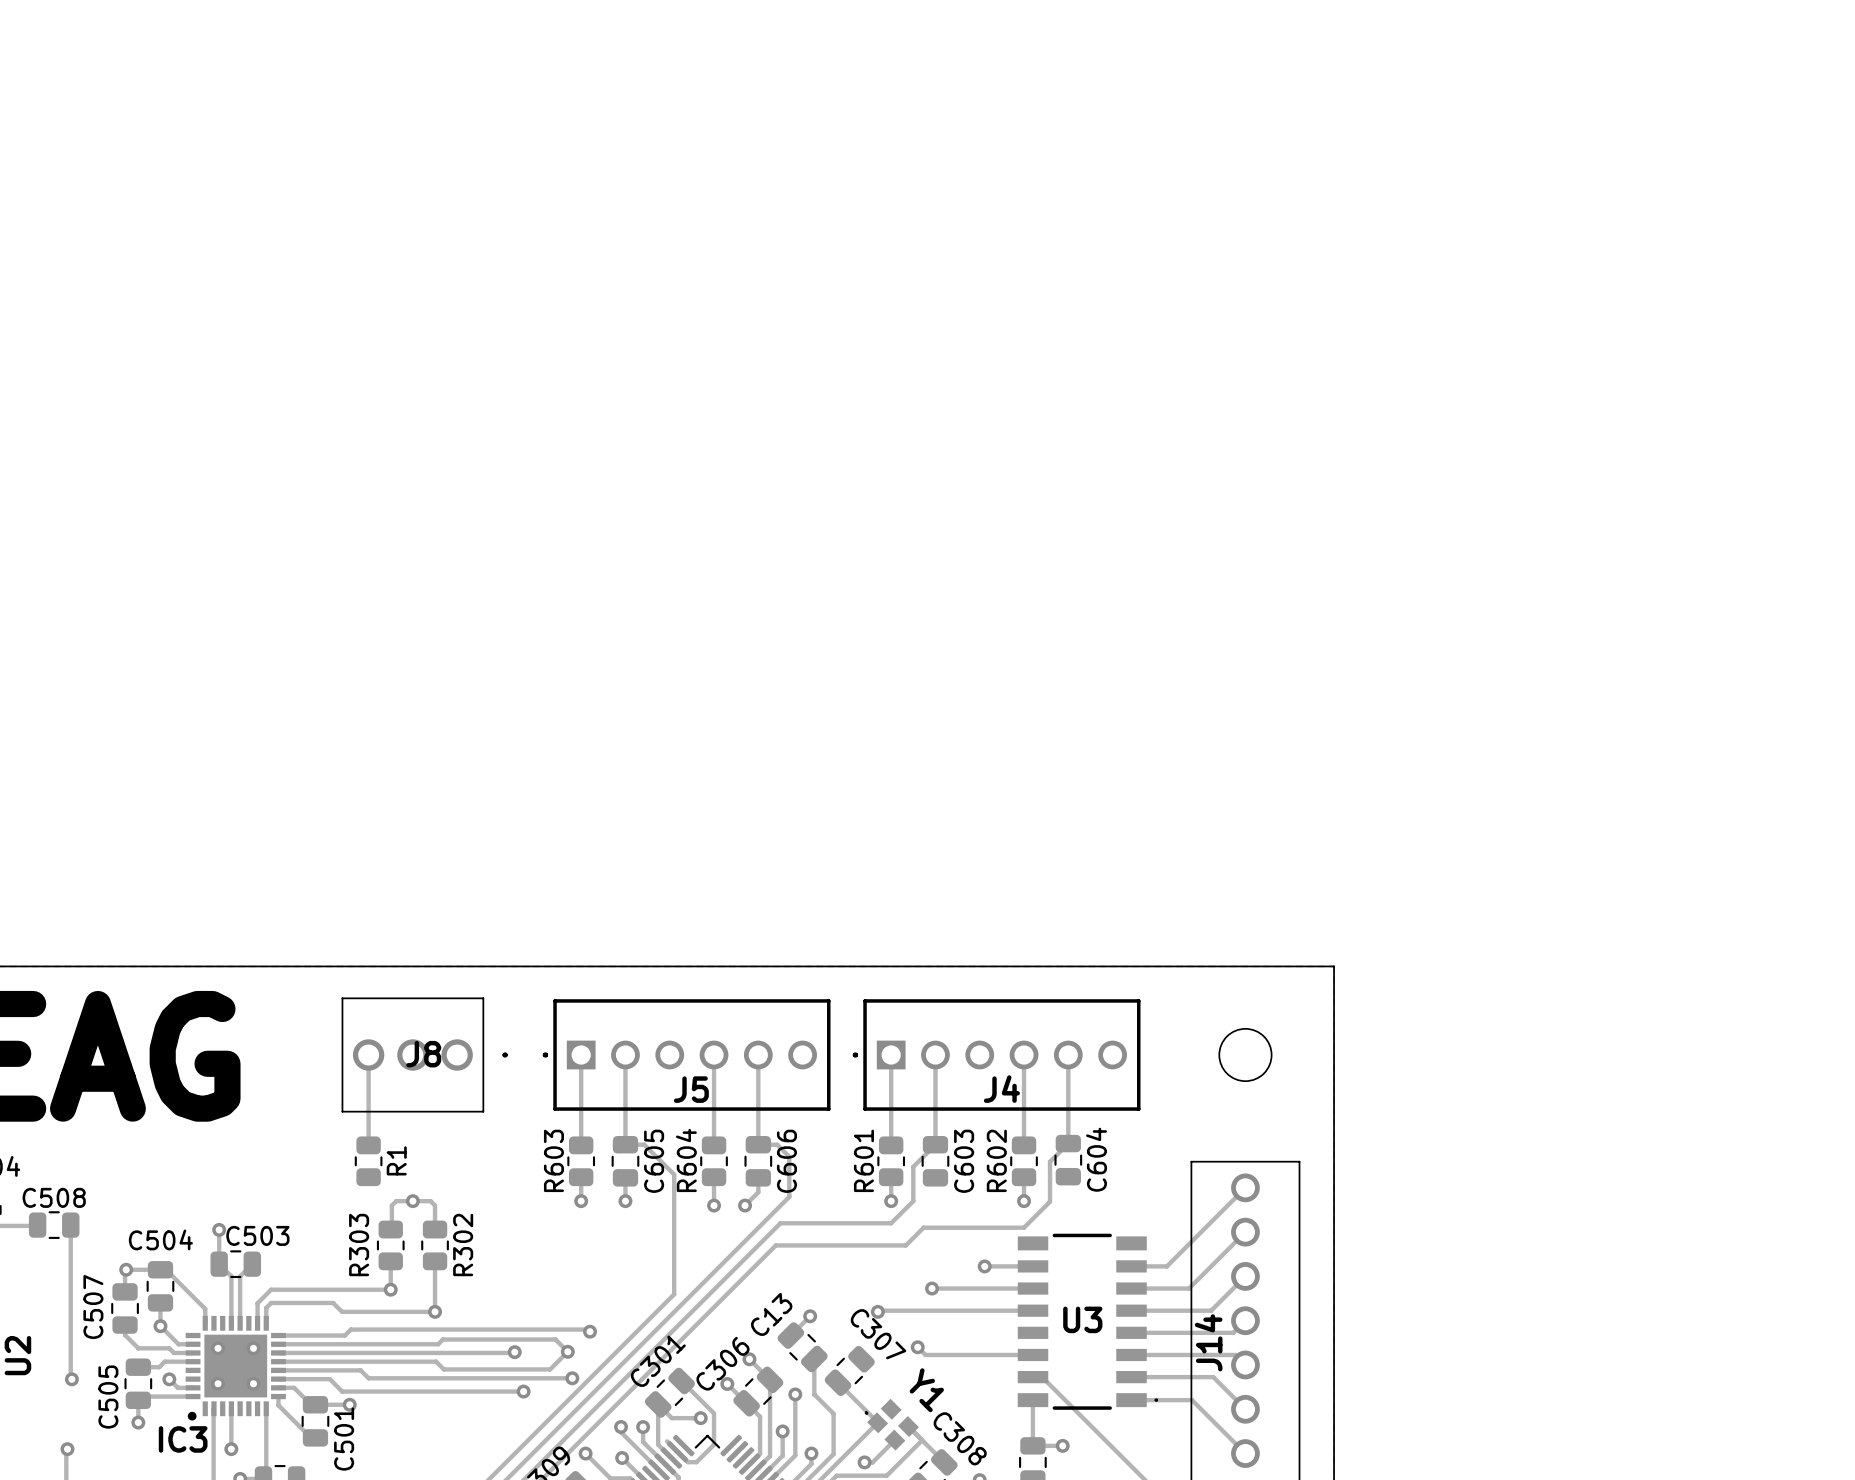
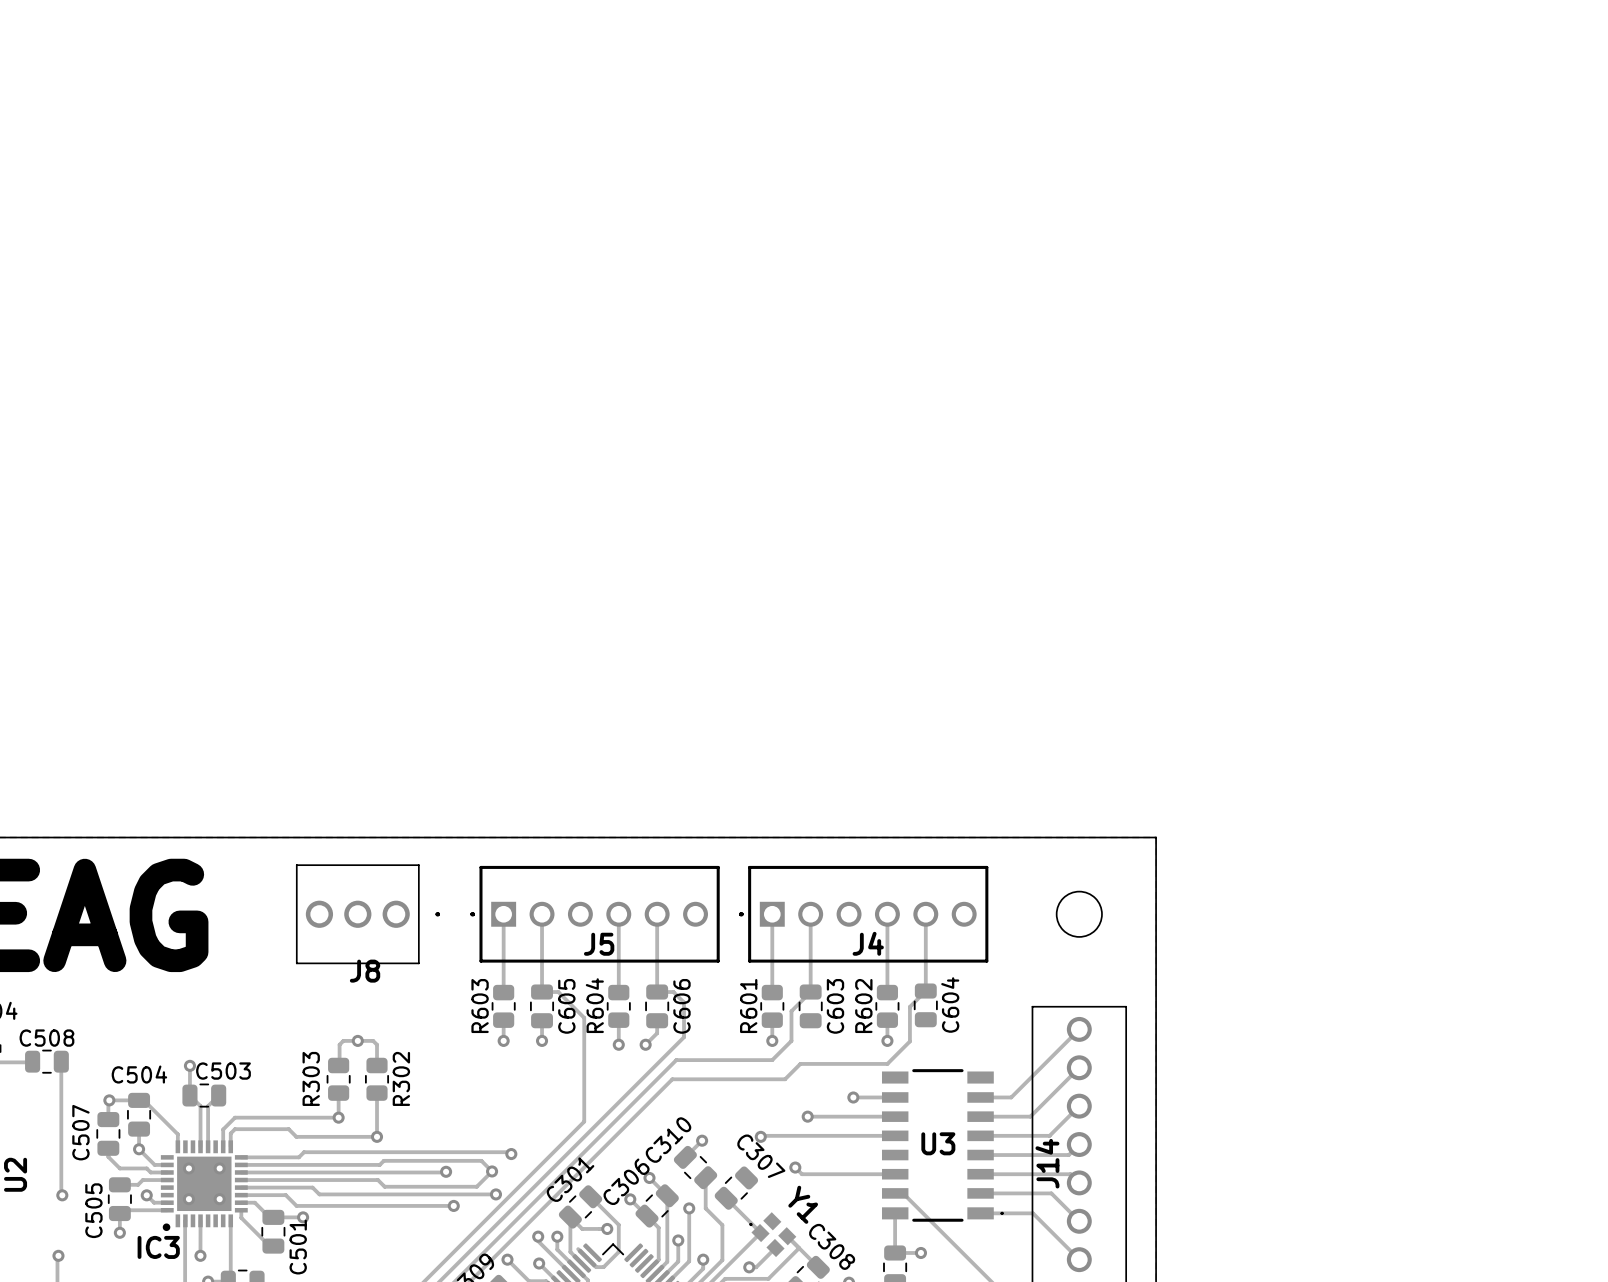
J8 name position: J8 (423, 1054) -> J8 (365, 971)
track: (368, 1055) (368, 1140) (364, 1145) -> none
R1: (368, 1161) -> none
C13 name: C13 (771, 1314) -> C310 (668, 1140)

